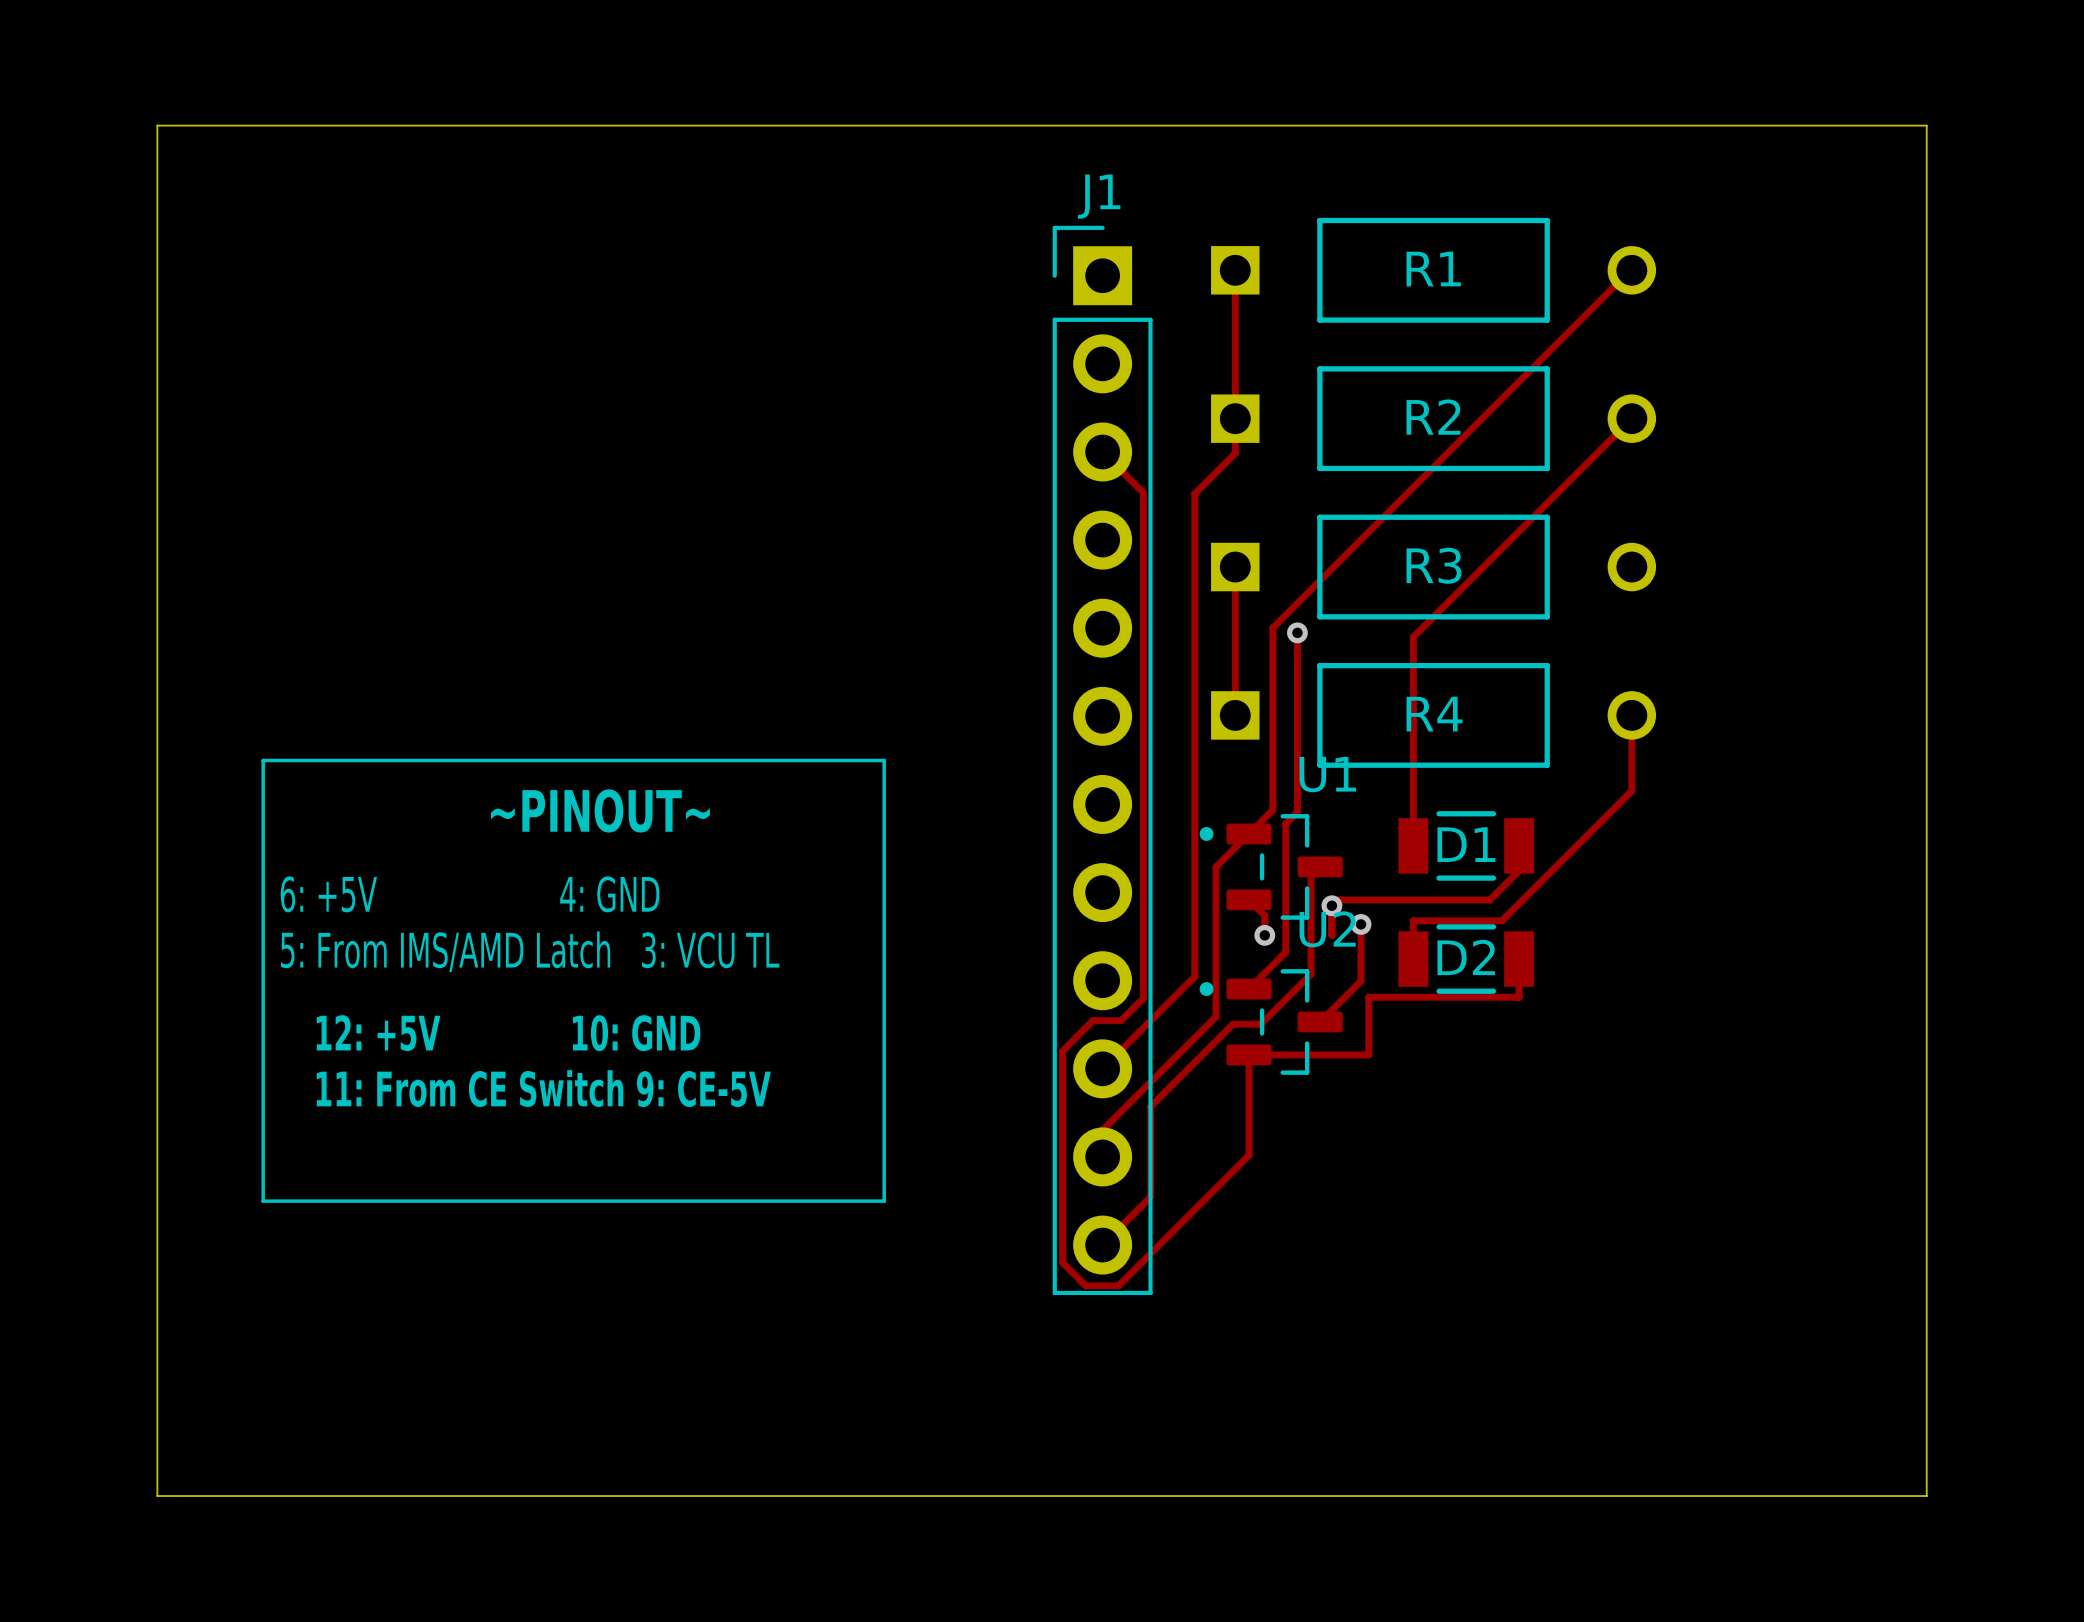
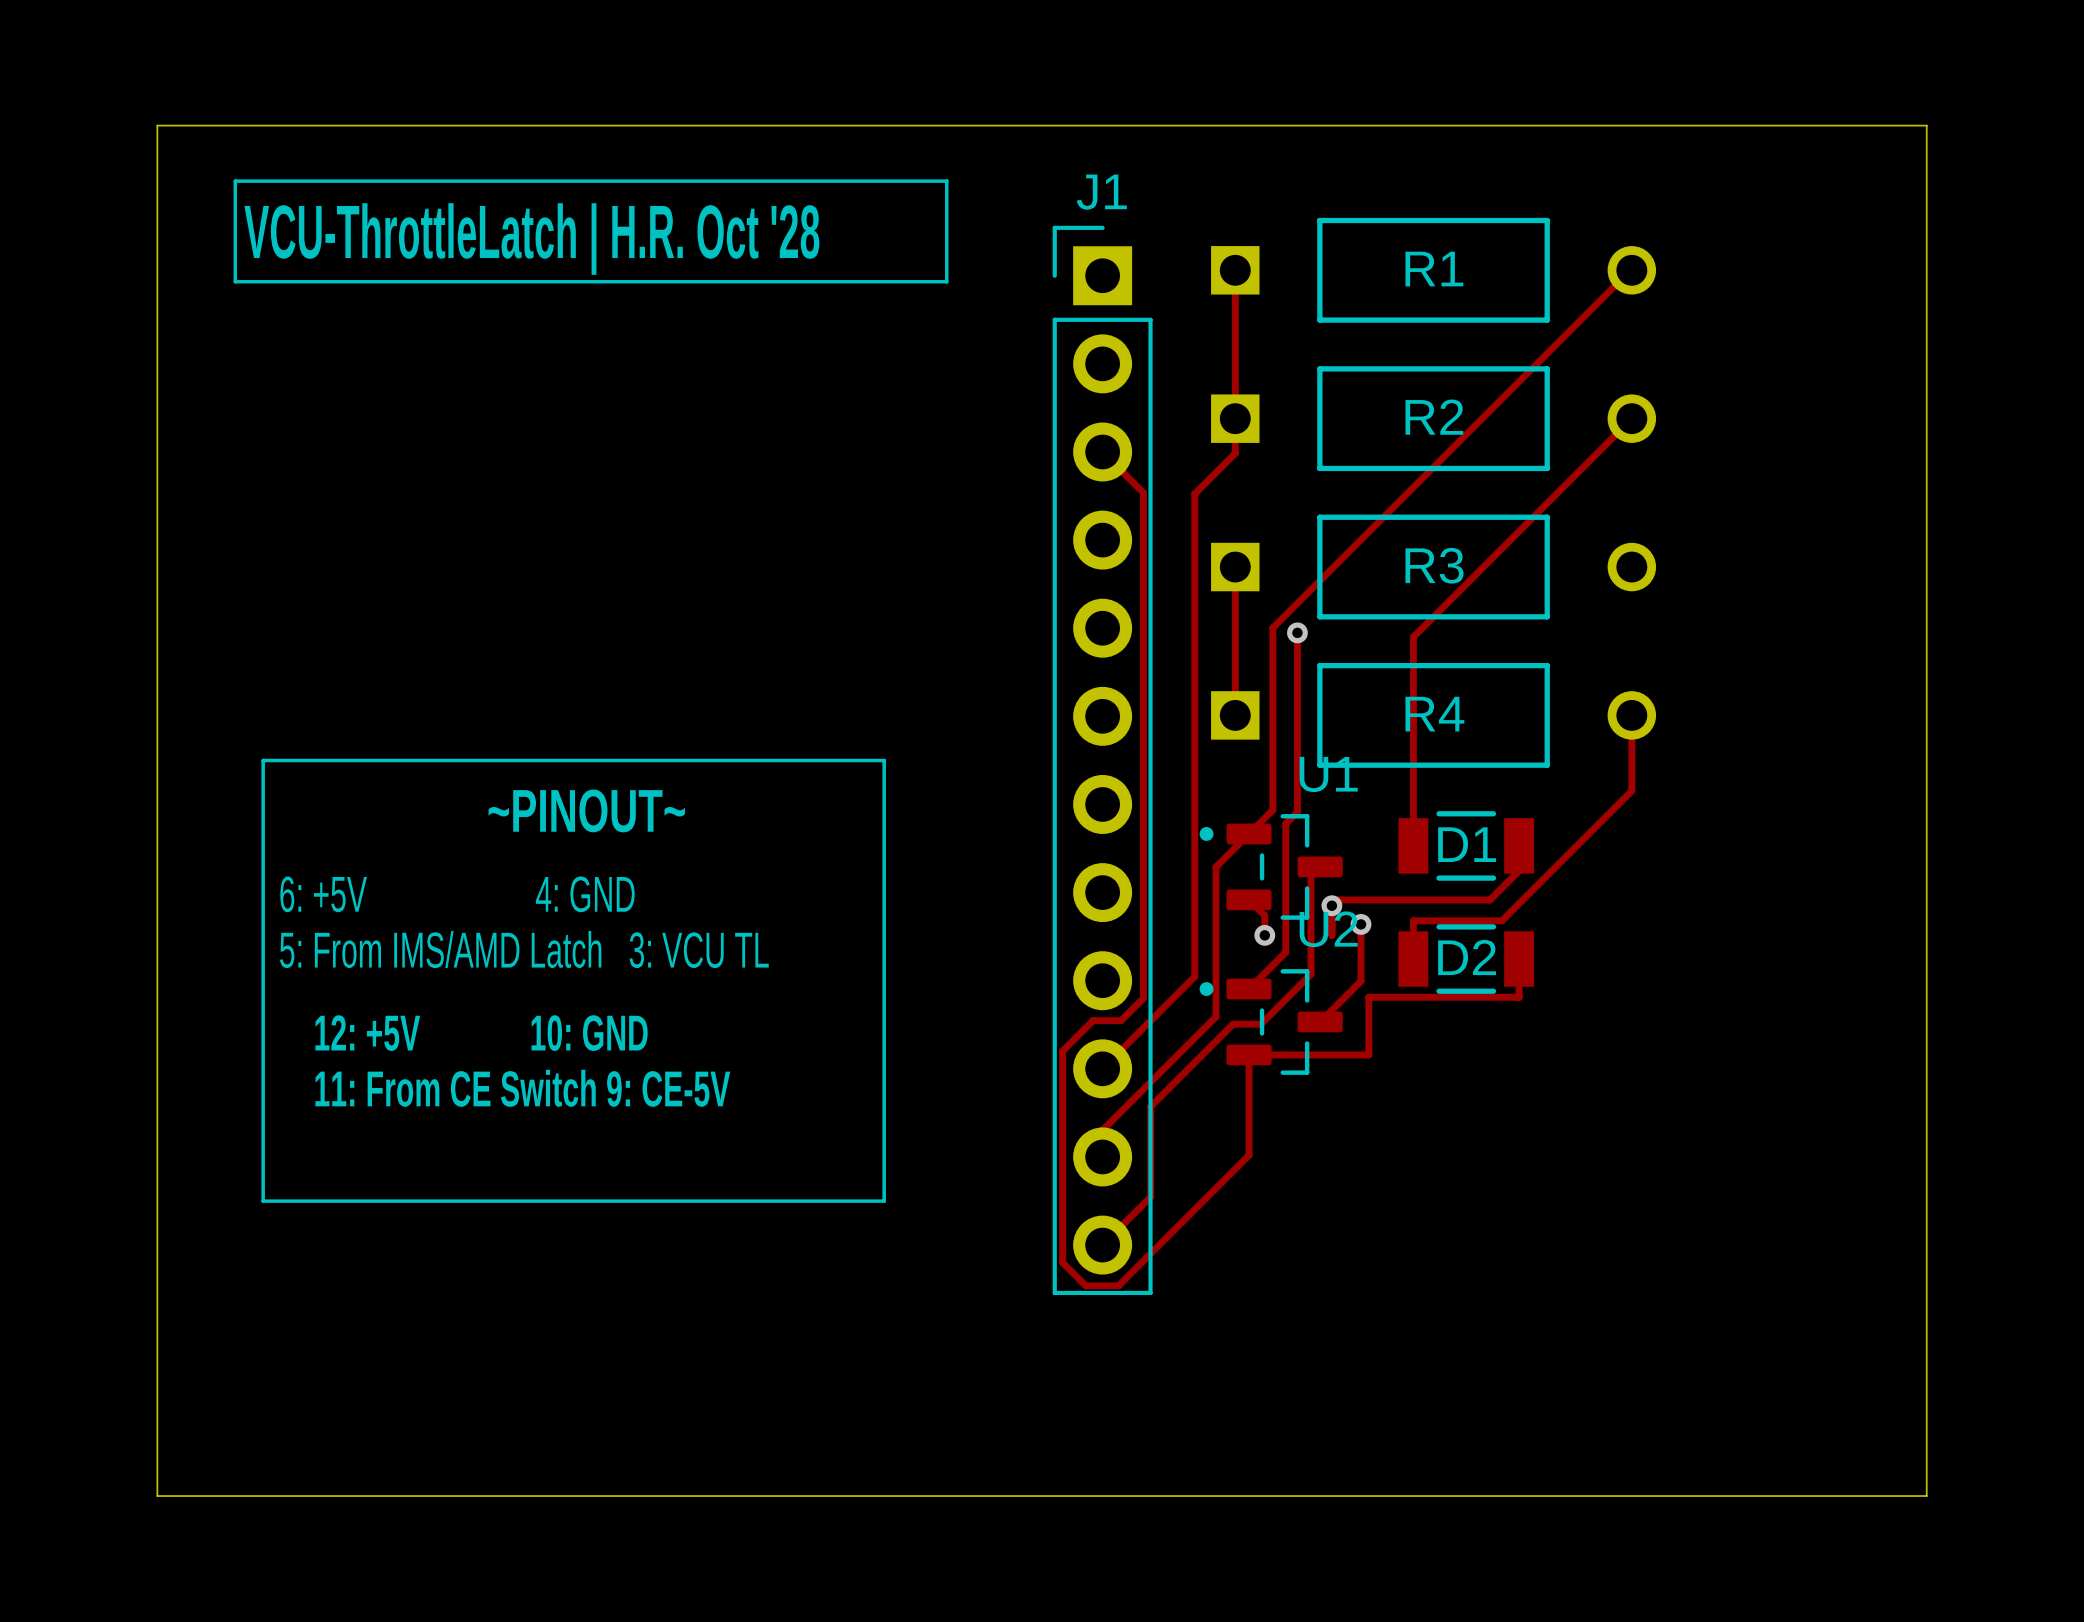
line: none -> (235, 181) (946, 181) (946, 281) (235, 281) (235, 181)
text: none -> VCU-ThrottleLatch | H.R. Oct '28 (531, 239)

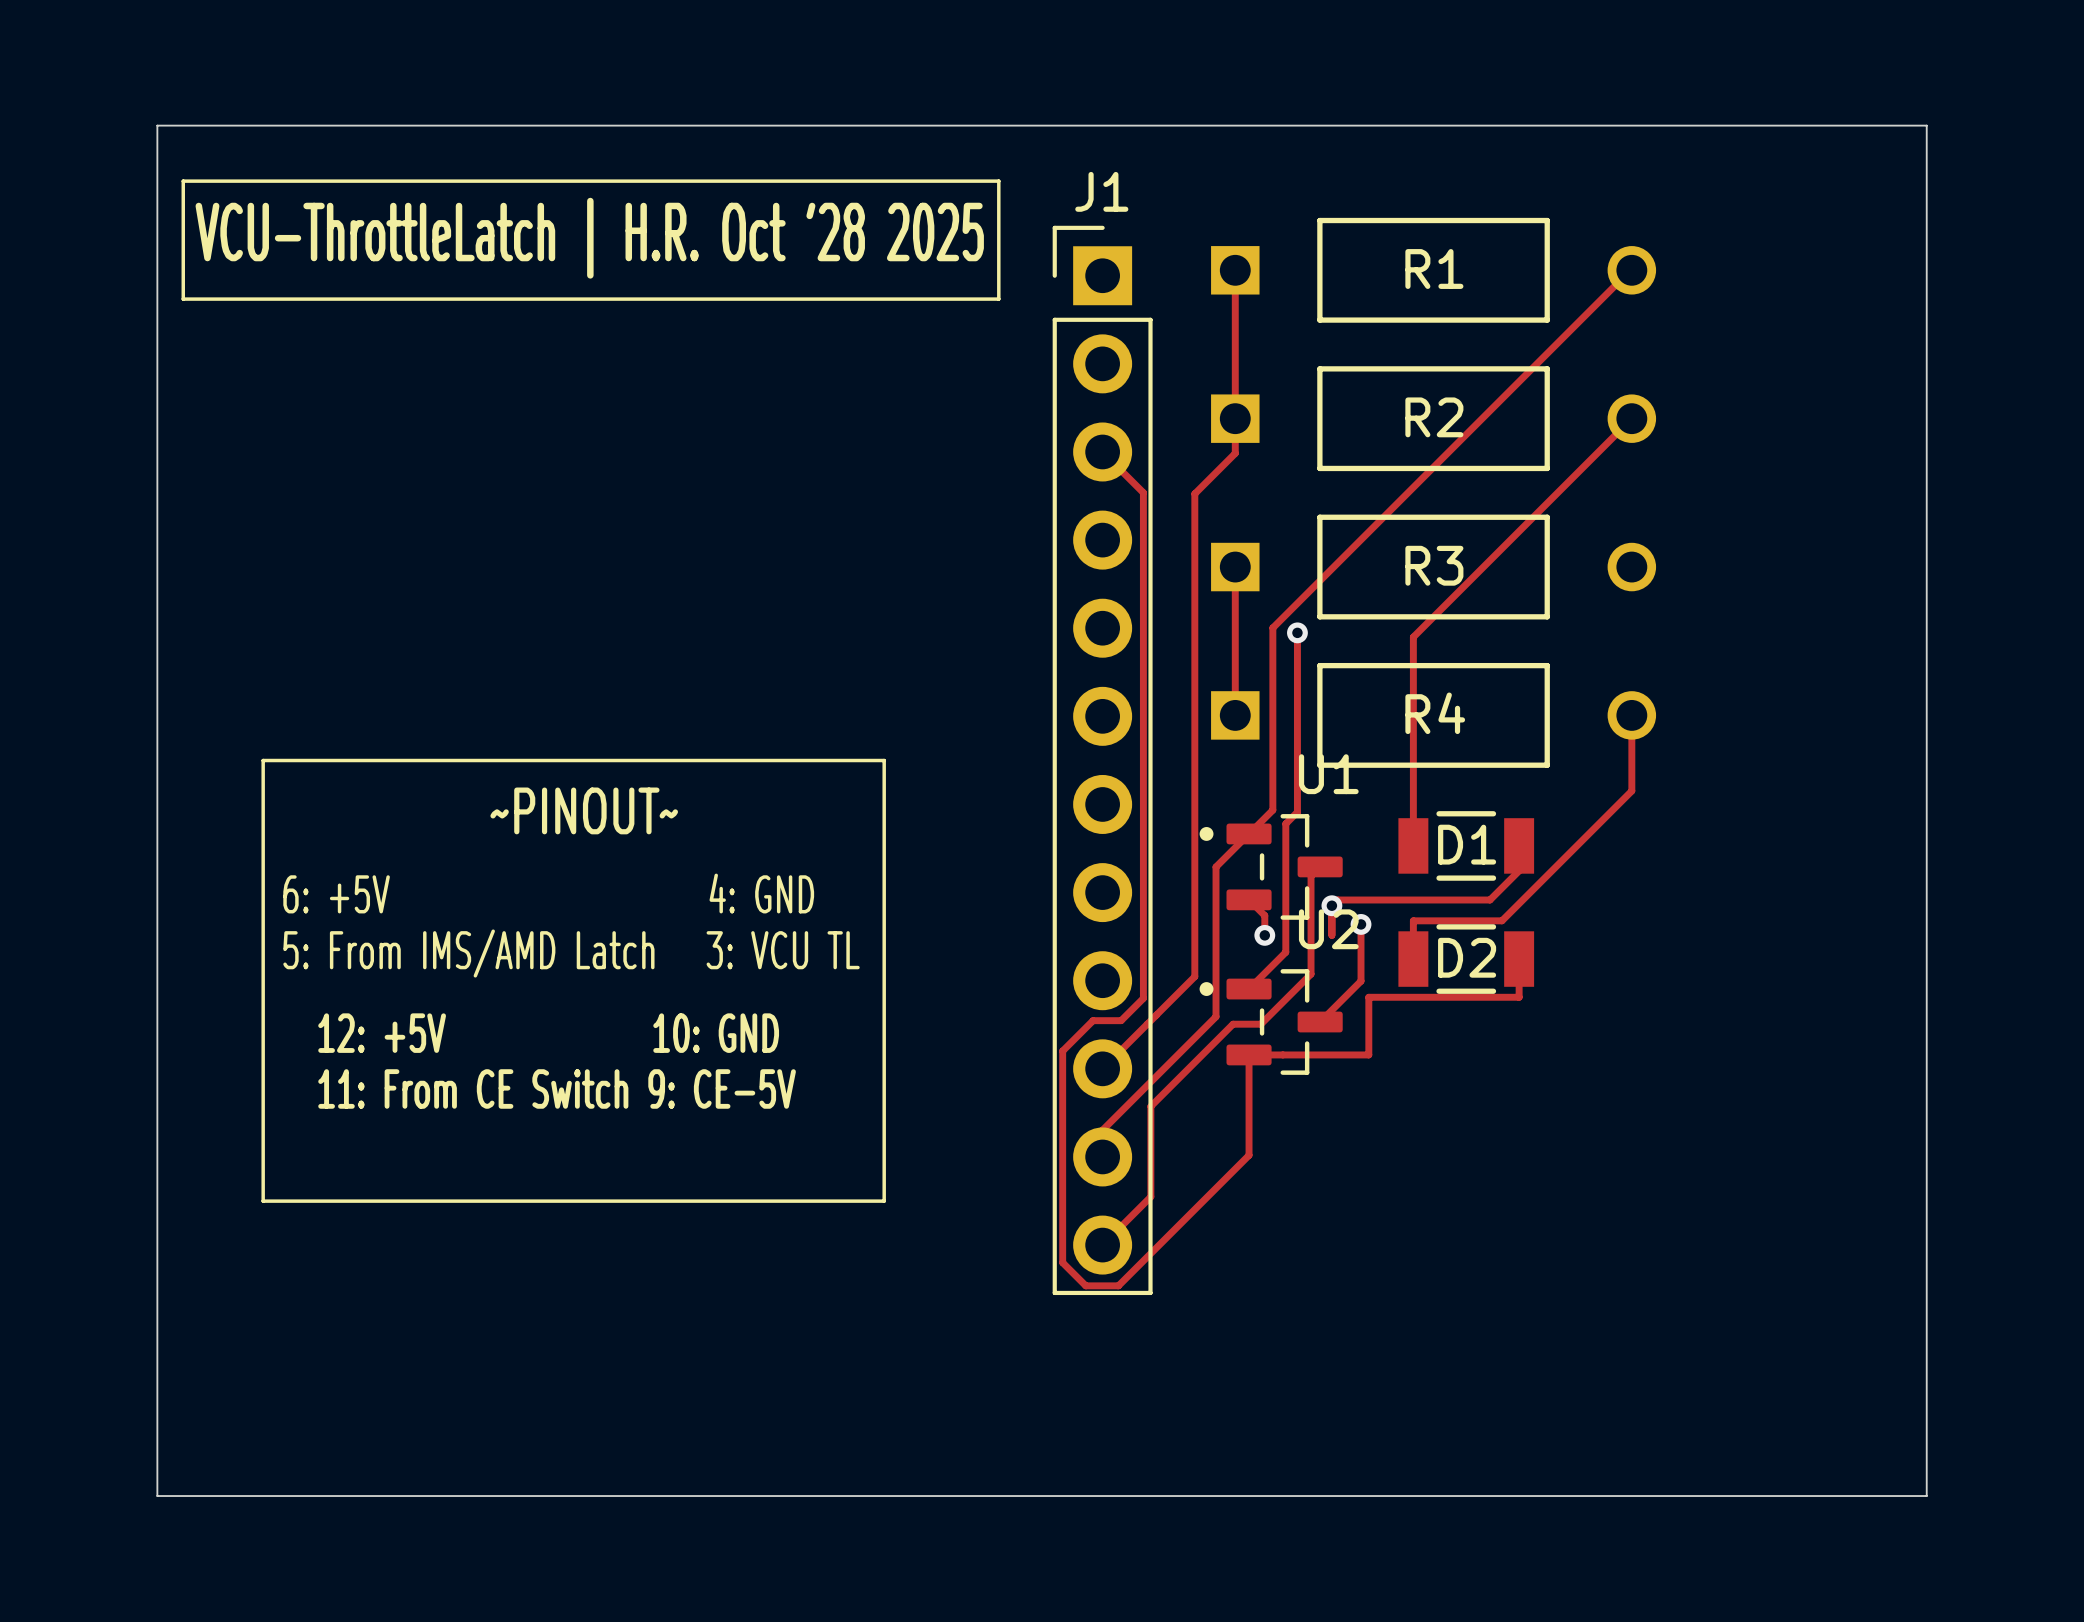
line: (235, 181) (235, 281) (946, 281) (946, 181) -> (235, 181) (183, 181) (183, 299) (998, 299) (998, 181) (946, 181)
text: VCU-ThrottleLatch | H.R. Oct '28 (531, 239) -> VCU-ThrottleLatch | H.R. Oct '28 2025 (589, 238)

